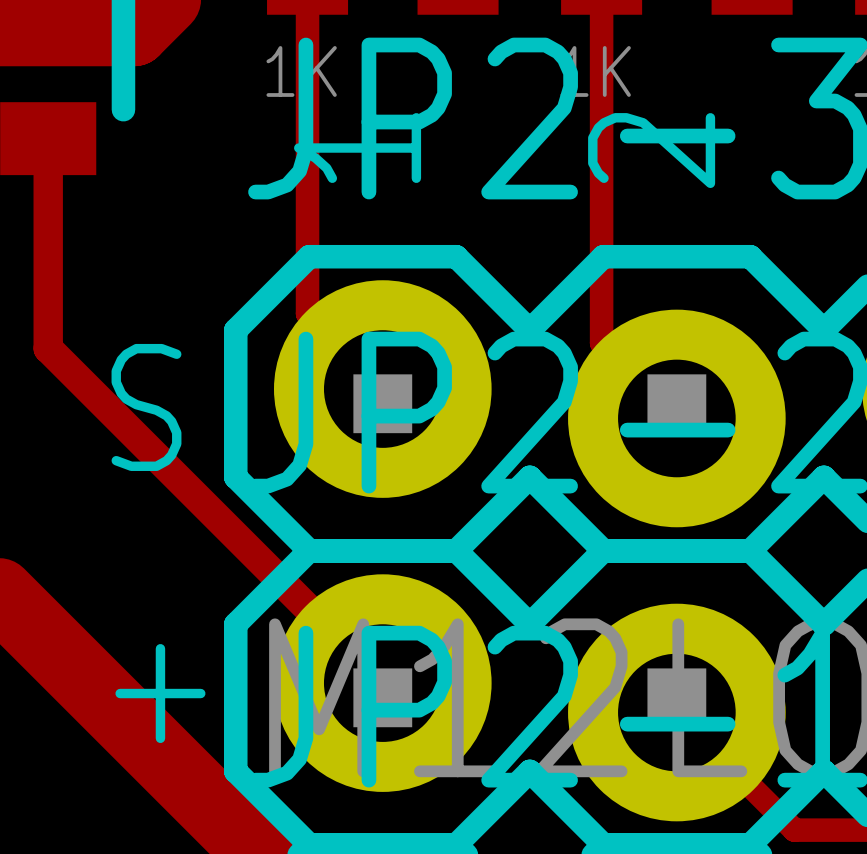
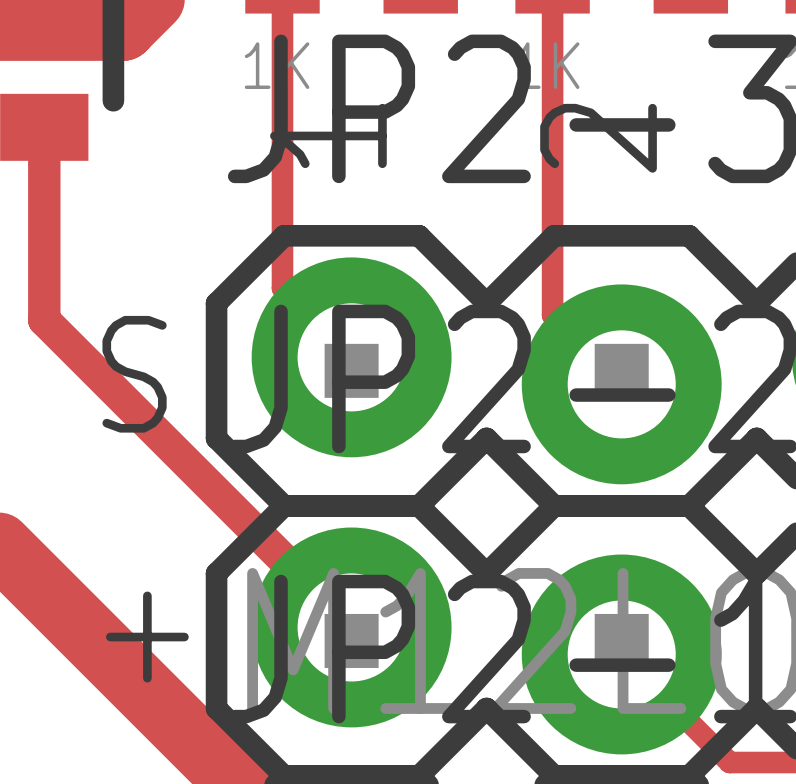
top track width: thin (48, 138) (48, 348) (382, 683) -> thick (44, 127) (44, 320) (351, 627)

